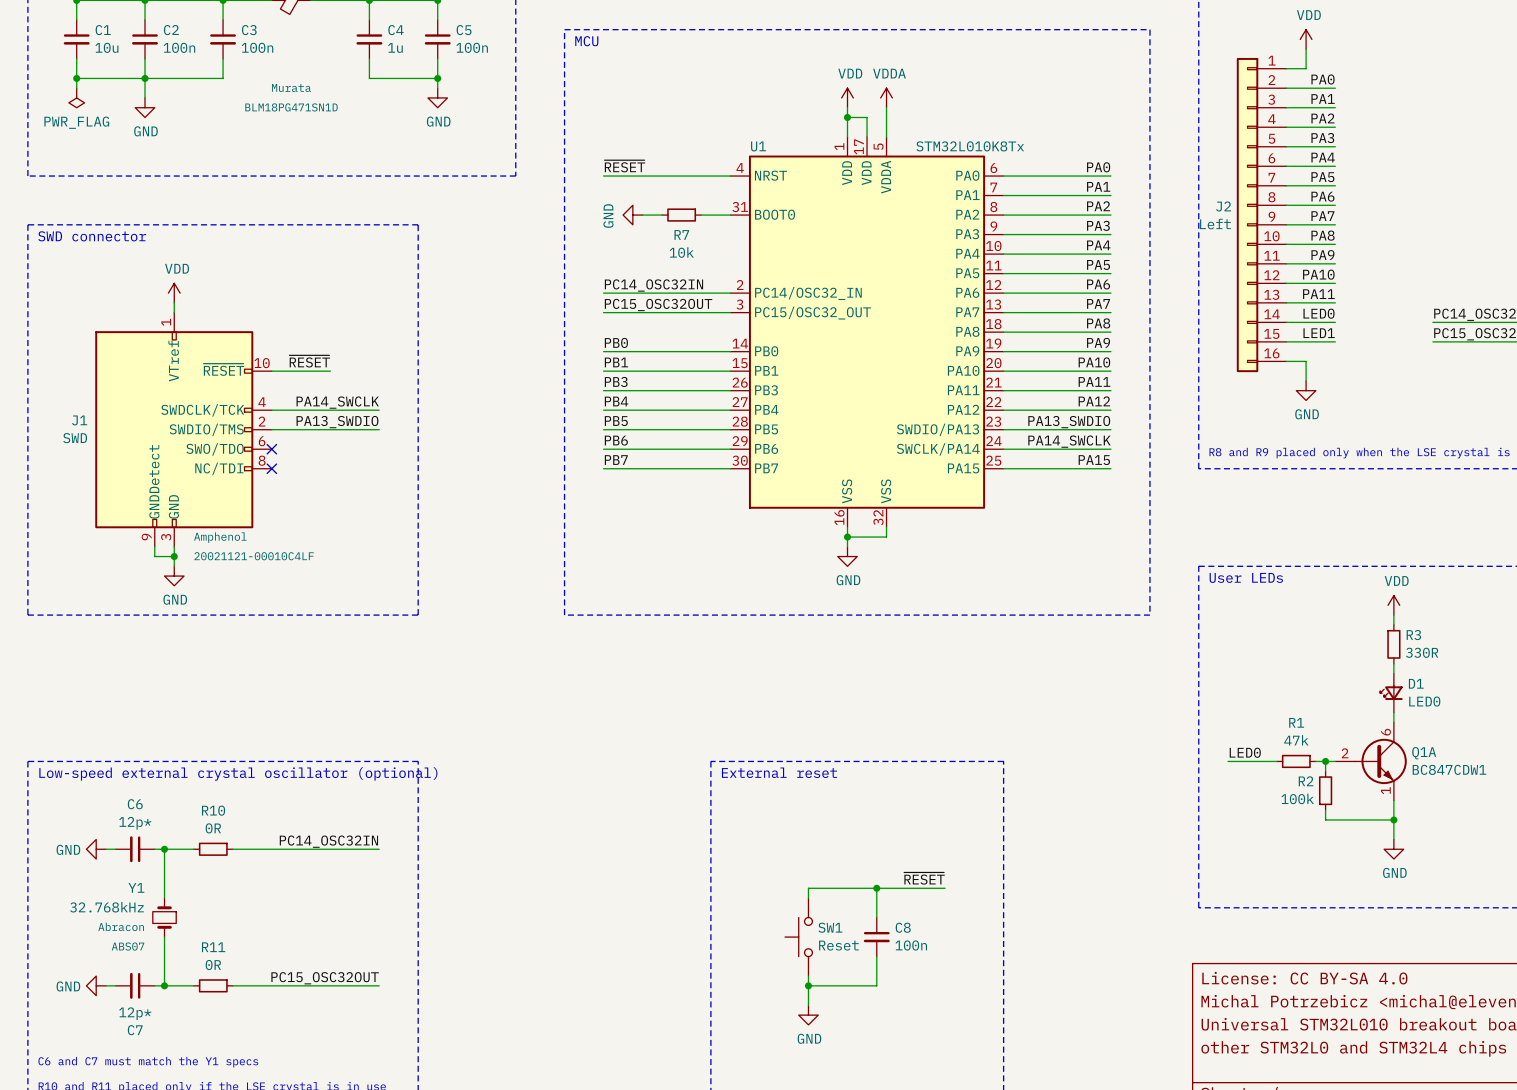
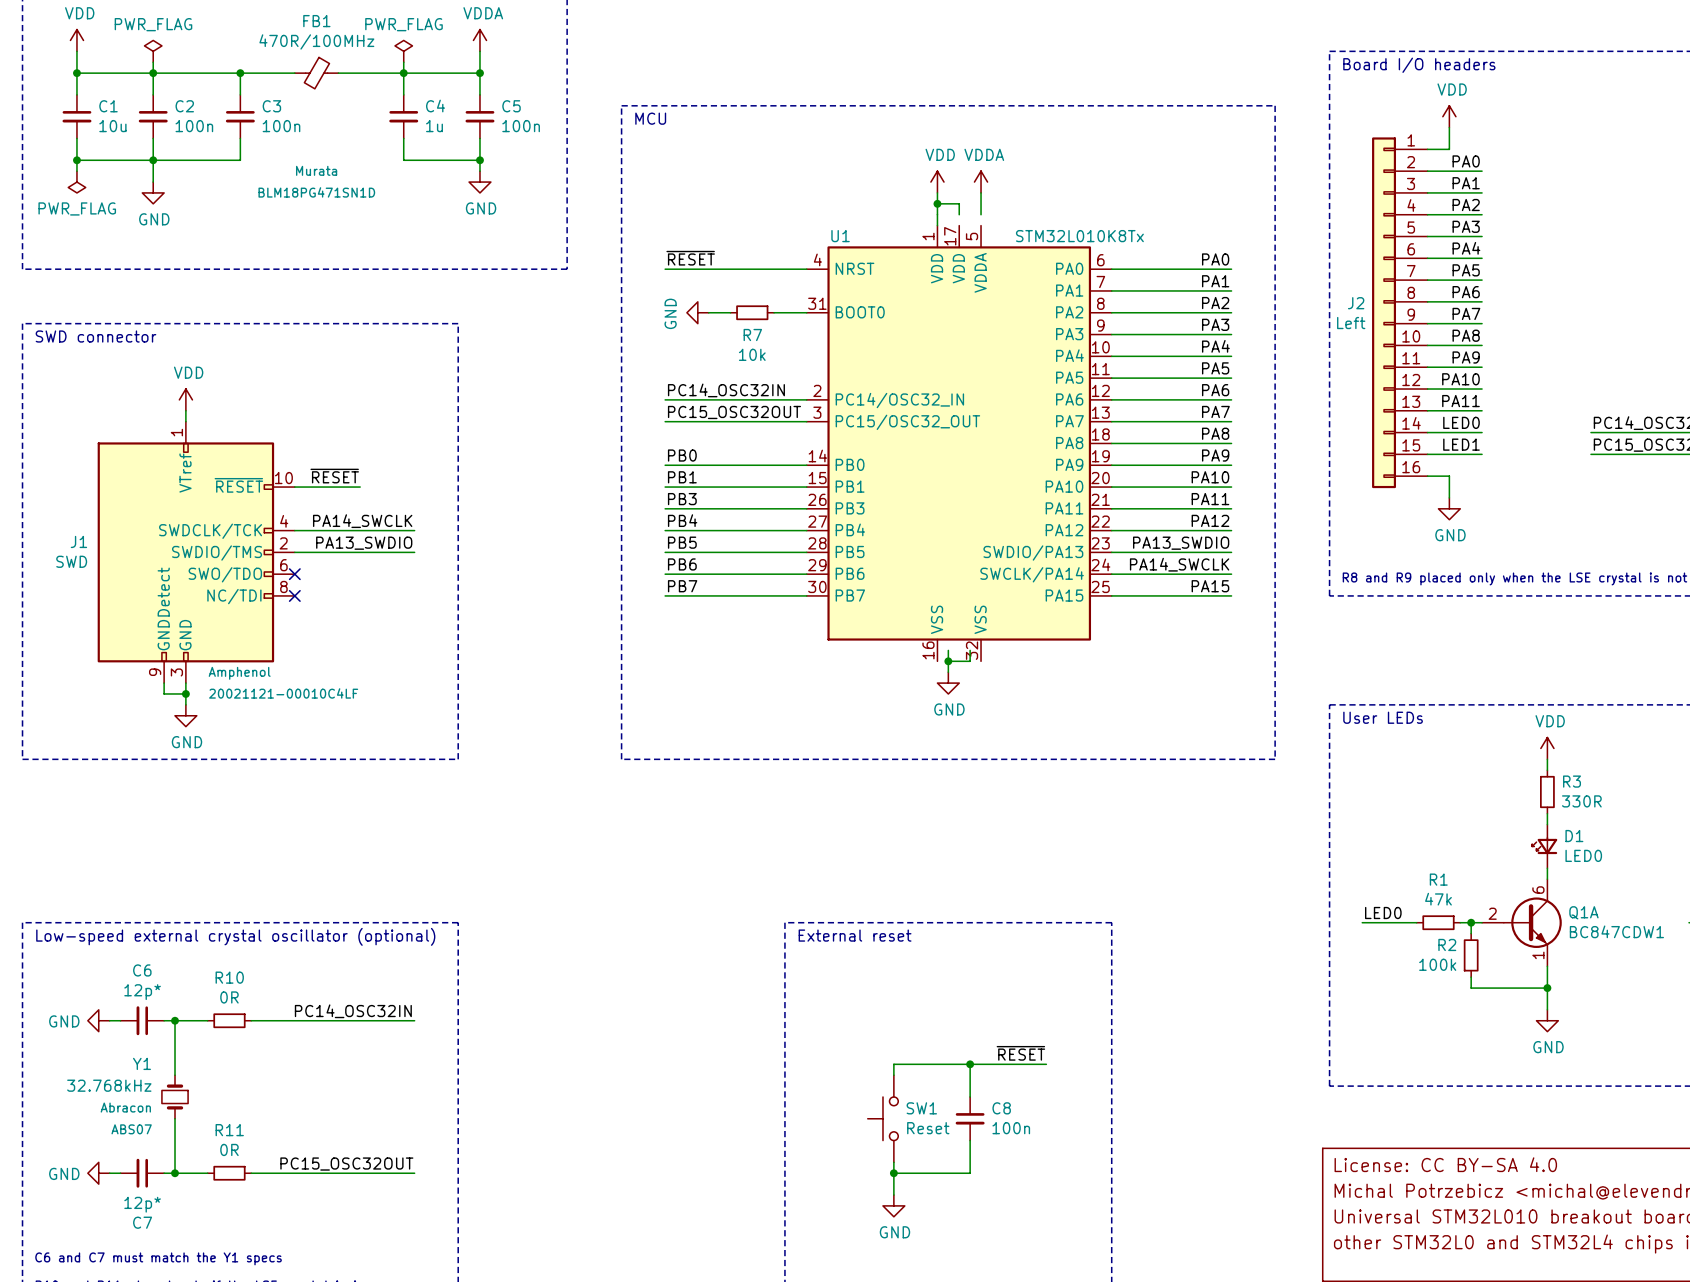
wire: (867, 127) (867, 137) -> none
wire: (886, 127) (886, 137) -> none
wire: none -> (970, 650) (970, 661) (948, 661)
wire: (847, 527) (847, 546) -> (948, 650) (948, 672)
wire: (886, 527) (886, 537) (847, 537) -> none
junction position: (847, 537) -> (948, 661)
power symbol position: GND (847, 556) -> GND (948, 683)

